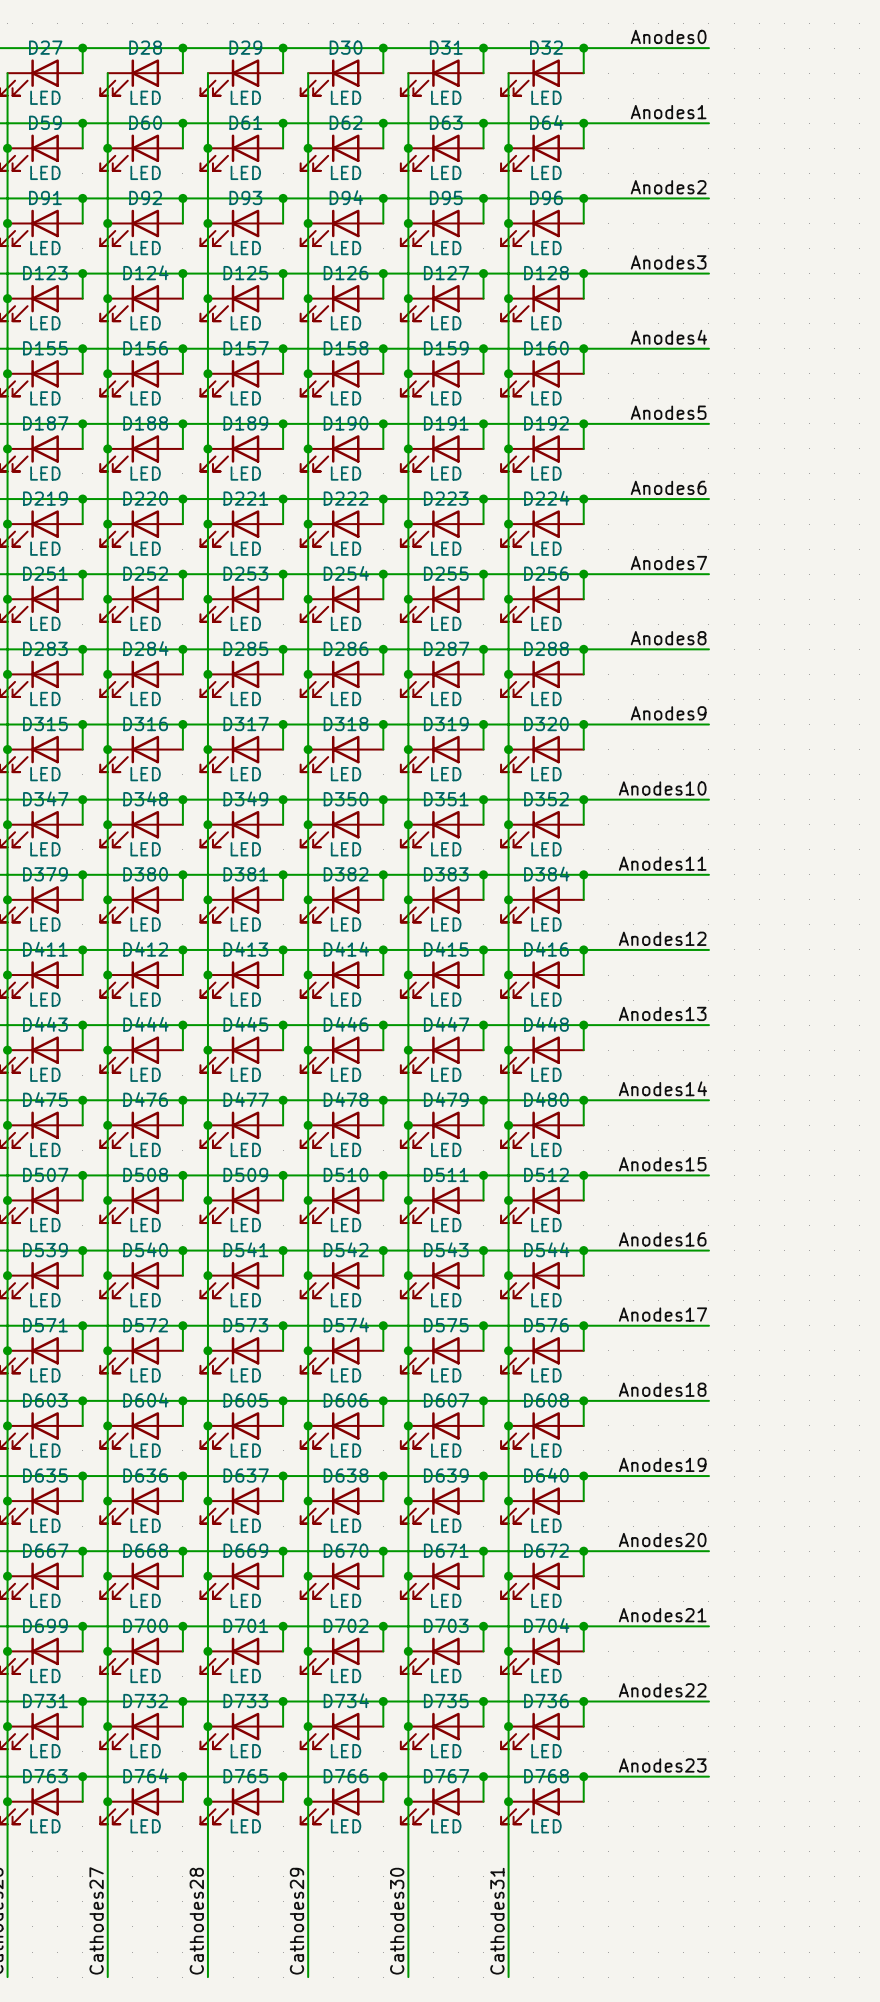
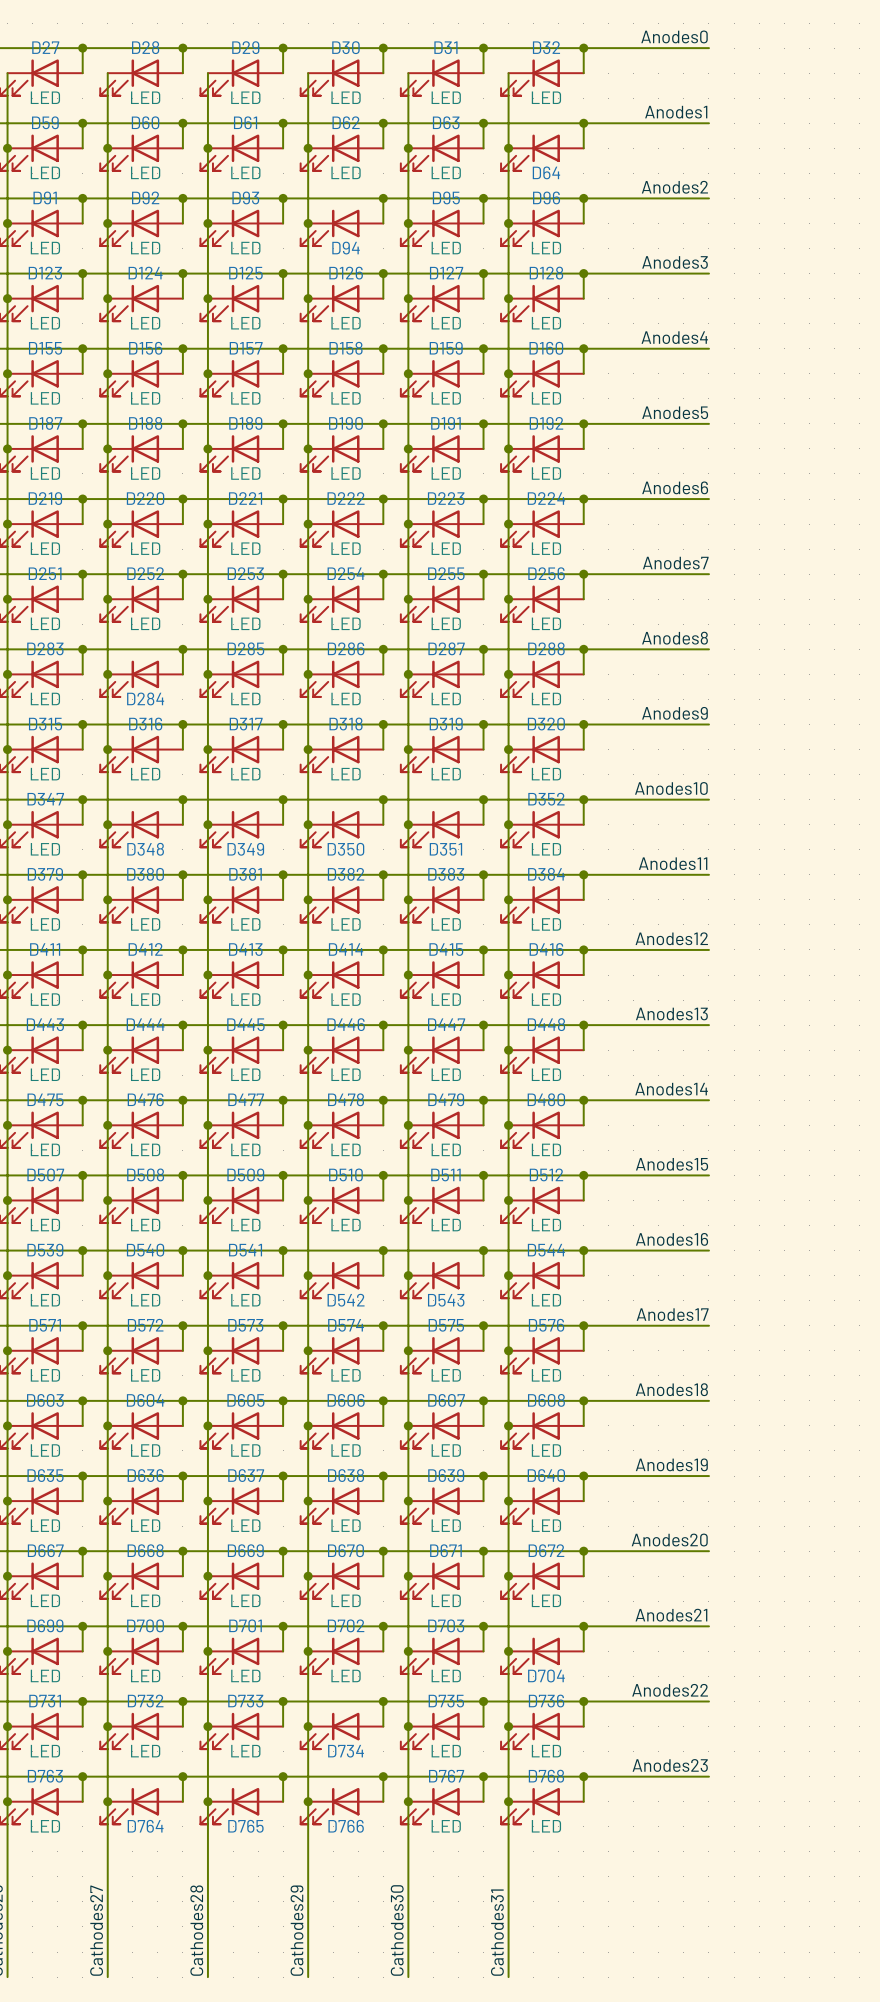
D64 name position: D64 (546, 122) -> D64 (546, 172)
D64 value: LED (546, 172) -> none
D94 name position: D94 (346, 197) -> D94 (346, 248)
D94 value: LED (346, 248) -> none
D284 name position: D284 (145, 648) -> D284 (145, 698)
D284 value: LED (145, 698) -> none
D348 name position: D348 (145, 798) -> D348 (145, 849)
D349 name position: D349 (245, 798) -> D349 (245, 849)
D350 name position: D350 (346, 799) -> D350 (345, 849)
D351 name position: D351 (446, 799) -> D351 (445, 849)
D348 value: LED (145, 849) -> none
D349 value: LED (245, 849) -> none
D350 value: LED (346, 849) -> none
D351 value: LED (446, 849) -> none
D542 name position: D542 (346, 1249) -> D542 (346, 1300)
D543 name position: D543 (446, 1249) -> D543 (446, 1300)
D542 value: LED (346, 1300) -> none
D543 value: LED (446, 1300) -> none
D704 name position: D704 (546, 1625) -> D704 (546, 1675)
D704 value: LED (546, 1675) -> none
D734 name position: D734 (346, 1700) -> D734 (346, 1751)
D734 value: LED (346, 1751) -> none
D764 name position: D764 (145, 1775) -> D764 (145, 1826)
D765 name position: D765 (245, 1776) -> D765 (245, 1826)
D766 name position: D766 (346, 1776) -> D766 (346, 1826)
D764 value: LED (145, 1826) -> none
D765 value: LED (245, 1826) -> none
D766 value: LED (346, 1826) -> none

